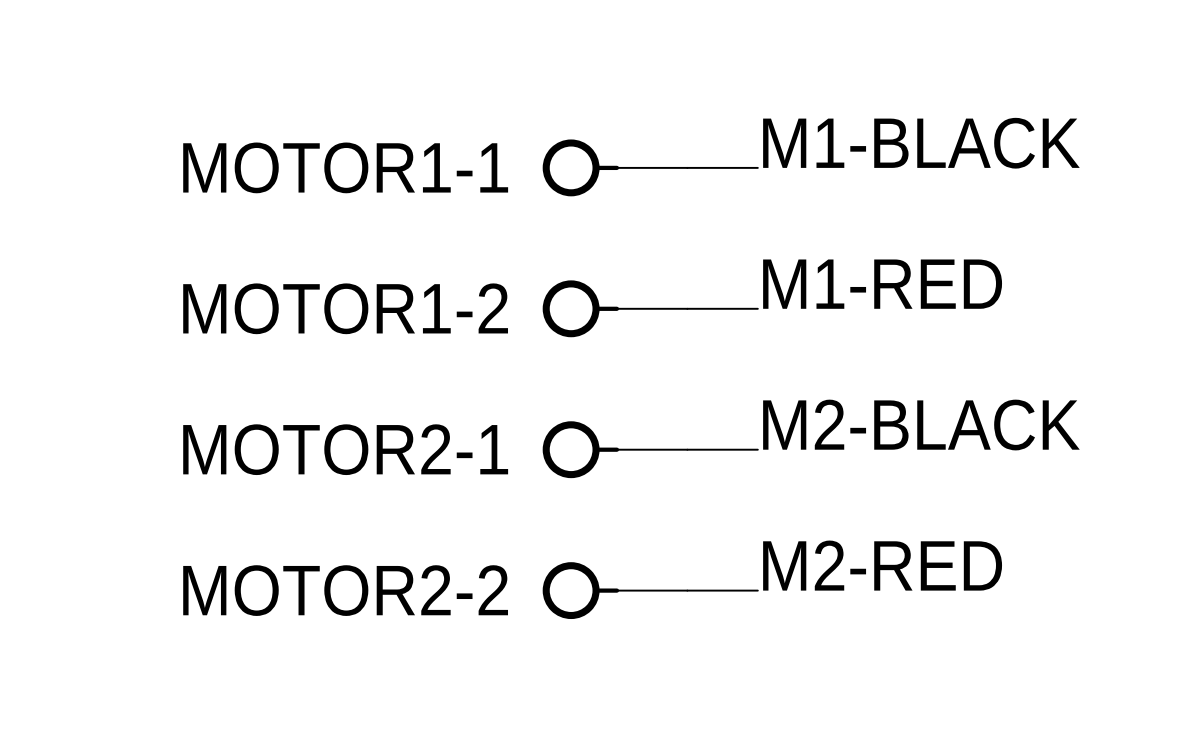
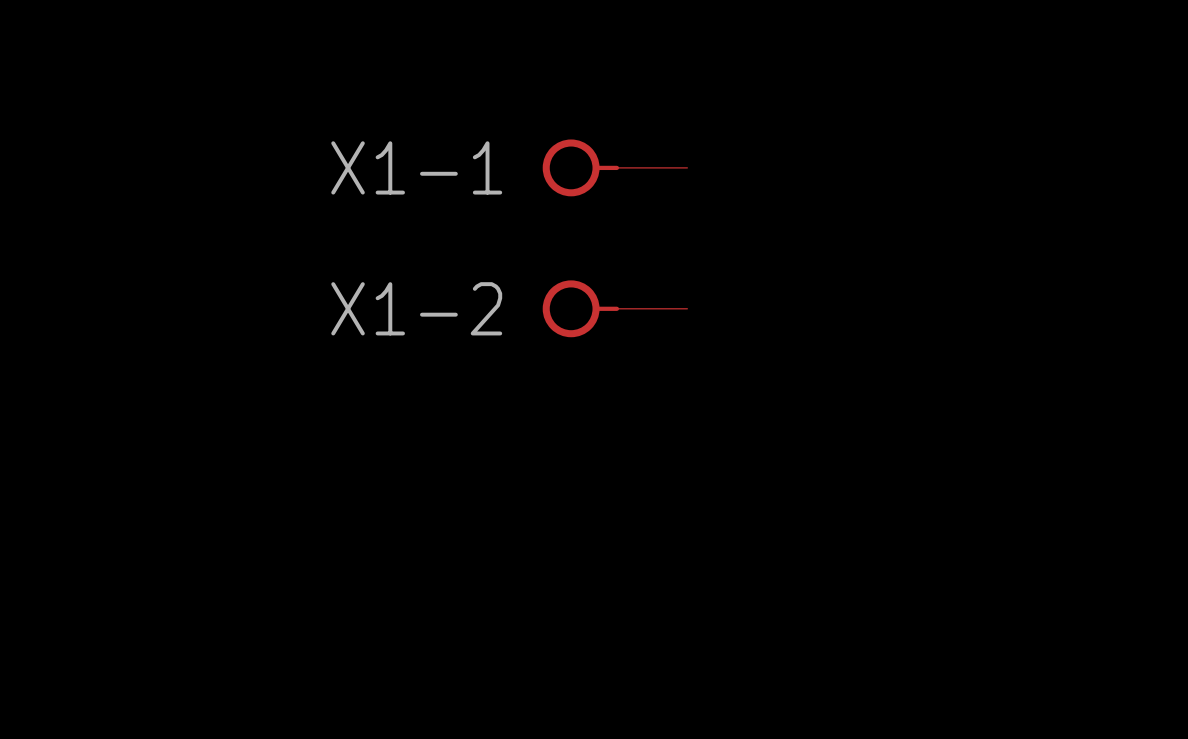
label: M1-BLACK (921, 143) -> none
MOTOR1-1 name: MOTOR1-1 (345, 167) -> X1-1 (416, 167)
wire: (687, 167) (757, 167) -> none
label: M1-RED (882, 284) -> none
MOTOR1-2 name: MOTOR1-2 (345, 308) -> X1-2 (416, 308)
wire: (687, 308) (757, 308) -> none
label: M2-BLACK (921, 425) -> none
MOTOR2-1: (615, 449) -> none
wire: (687, 449) (757, 449) -> none
label: M2-RED (882, 565) -> none
MOTOR2-2: (615, 590) -> none
wire: (687, 590) (757, 590) -> none

